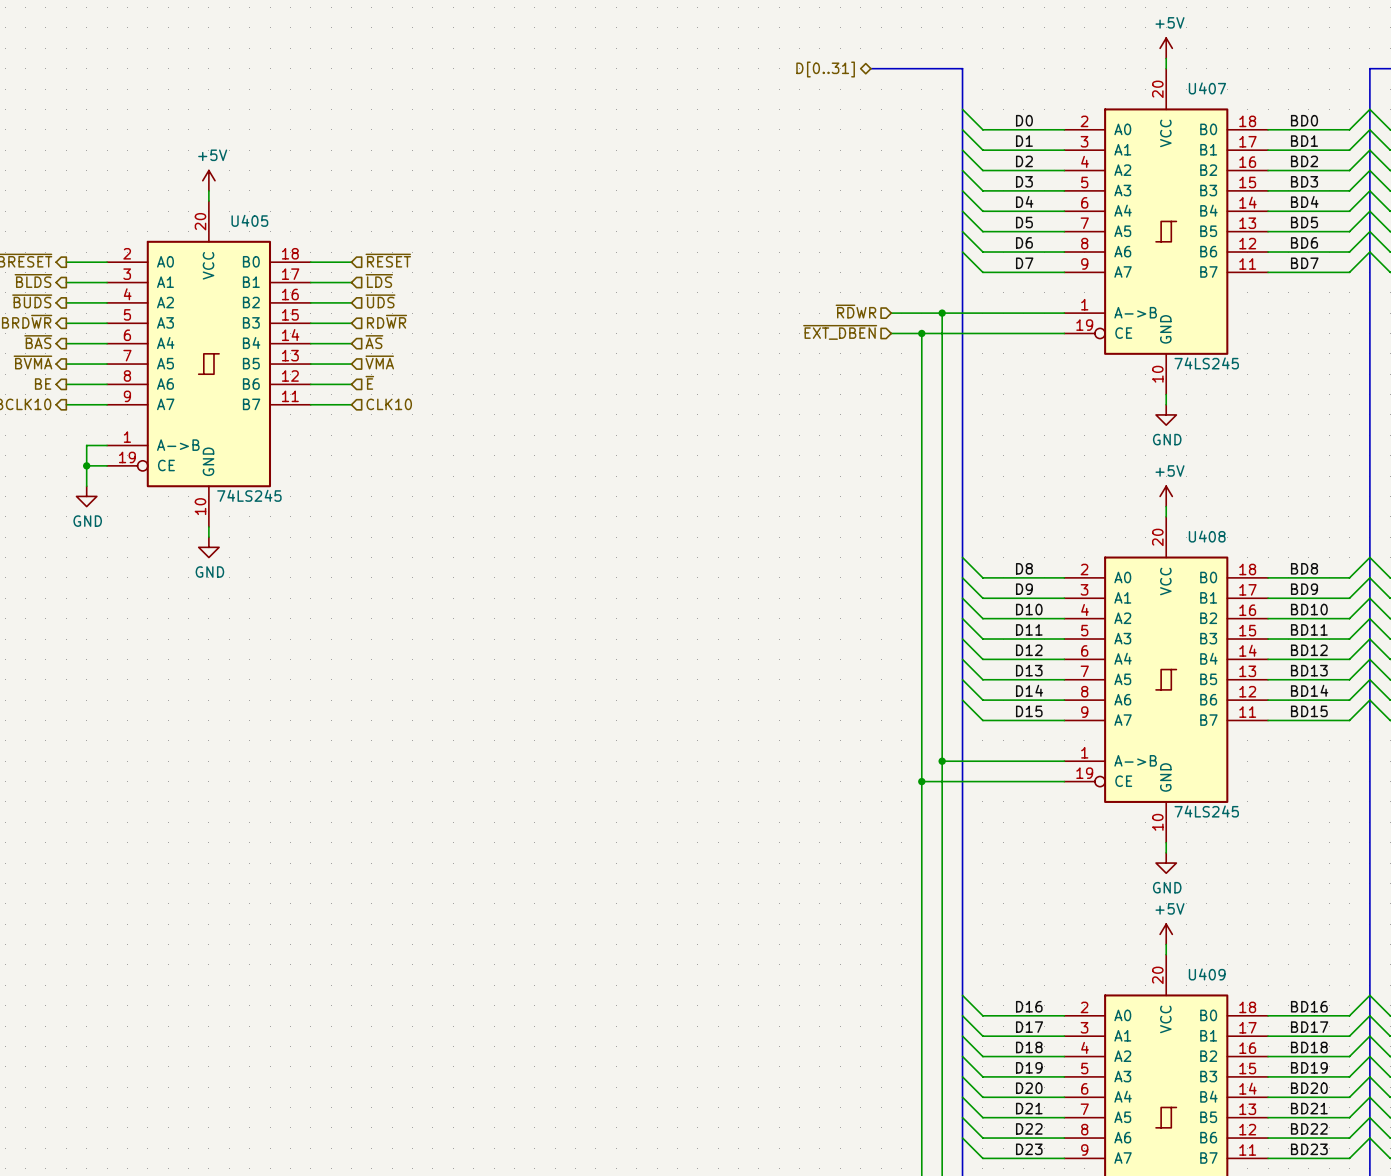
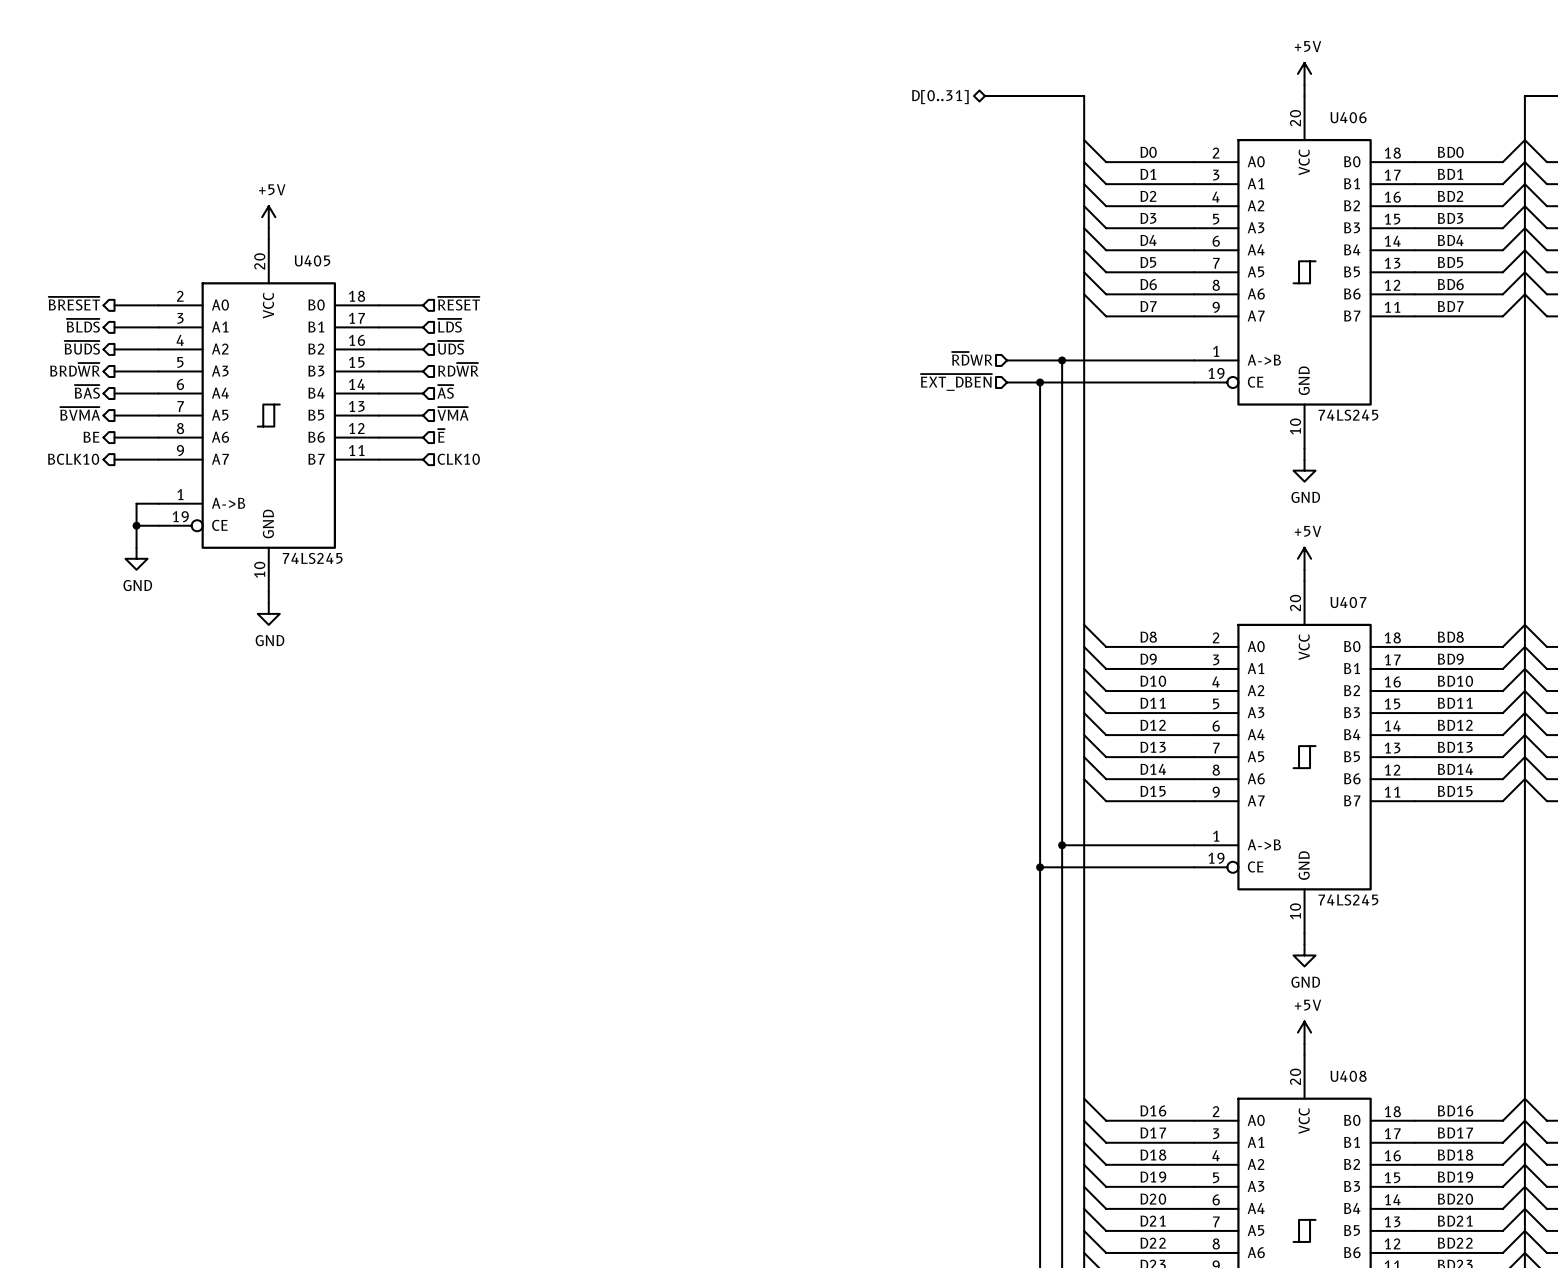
U407 name: U407 (1207, 88) -> U406 (1348, 117)
U408 name: U408 (1207, 536) -> U407 (1348, 602)
U409 name: U409 (1207, 974) -> U408 (1348, 1076)

